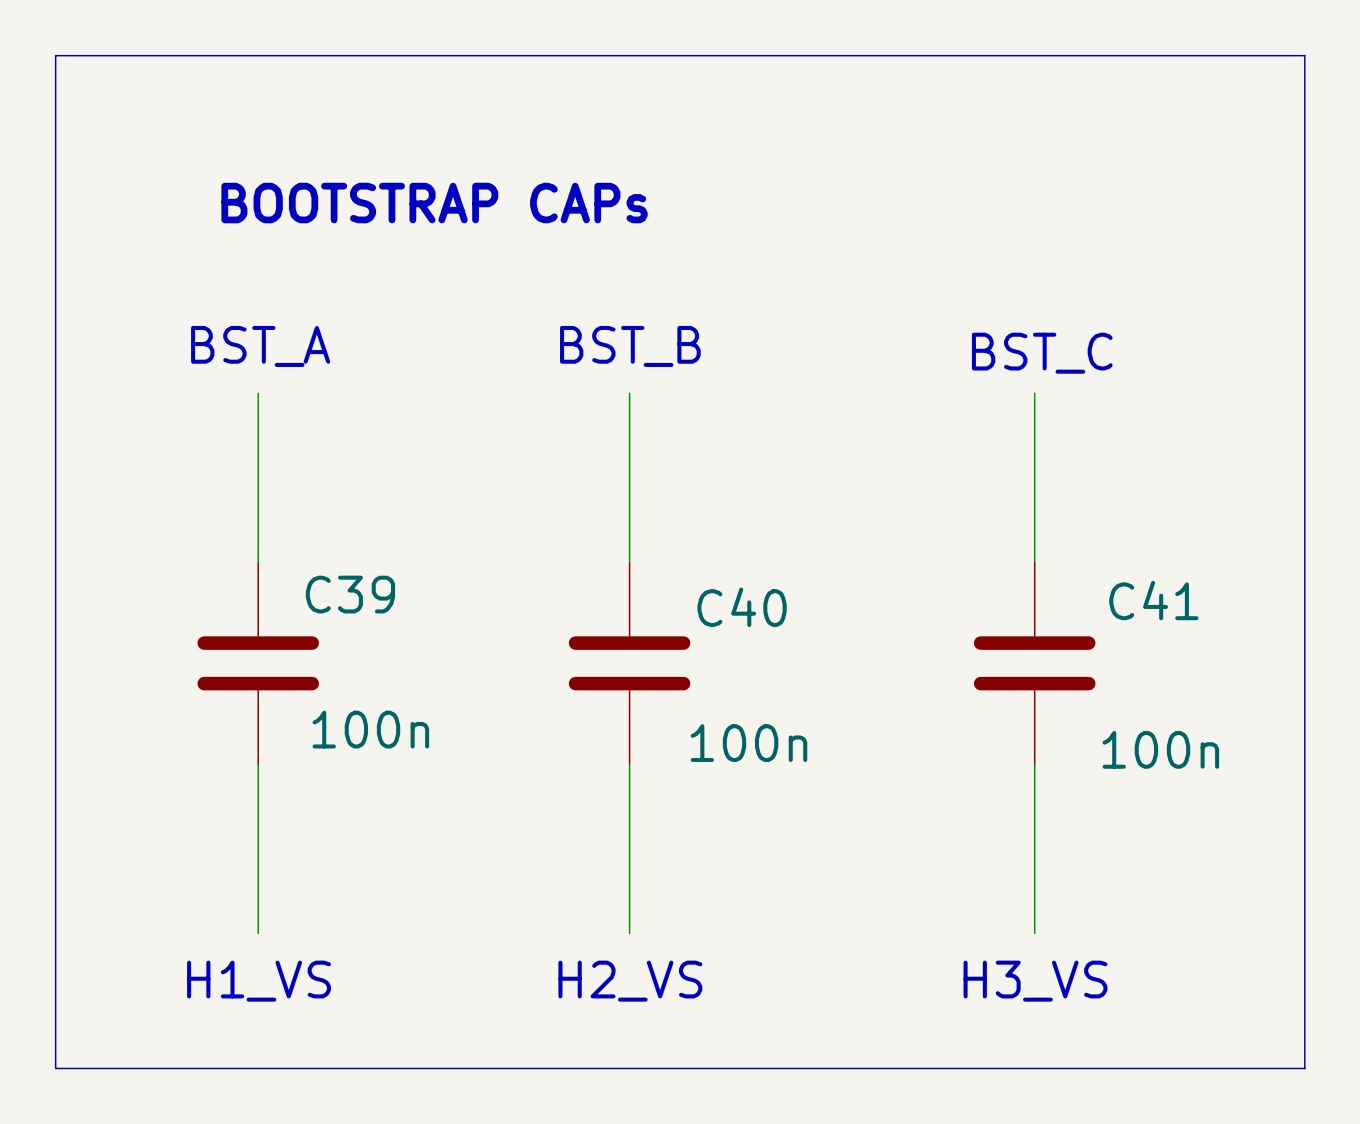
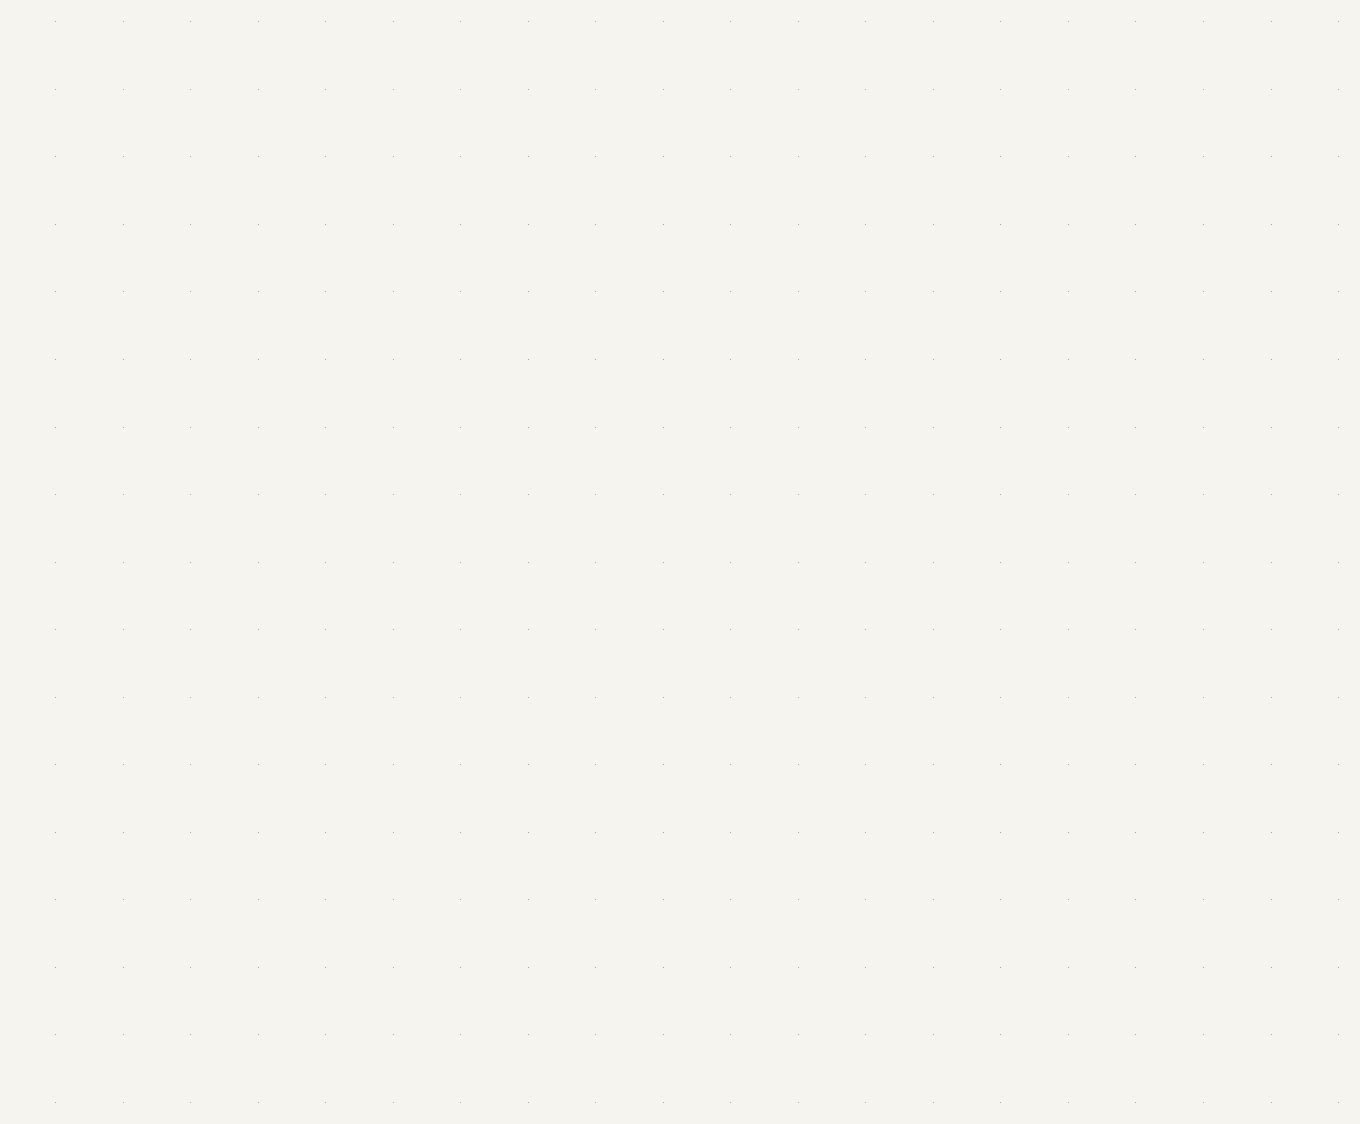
line: (55, 55) (55, 1068) (1304, 1068) (1304, 55) (55, 55) -> none
text: BOOTSTRAP CAPs (434, 203) -> none
text: BST_A (260, 346) -> none
text: BST_B (630, 346) -> none
text: BST_C (1042, 353) -> none
wire: (258, 393) (258, 562) -> none
wire: (629, 393) (629, 562) -> none
wire: (1034, 393) (1034, 562) -> none
C39: 100n (258, 663) -> none
C40: 100n (629, 663) -> none
C41: 100n (1034, 663) -> none
wire: (258, 764) (258, 933) -> none
wire: (629, 764) (629, 933) -> none
wire: (1034, 764) (1034, 933) -> none
text: H1_VS (259, 981) -> none
text: H2_VS (630, 981) -> none
text: H3_VS (1035, 981) -> none

